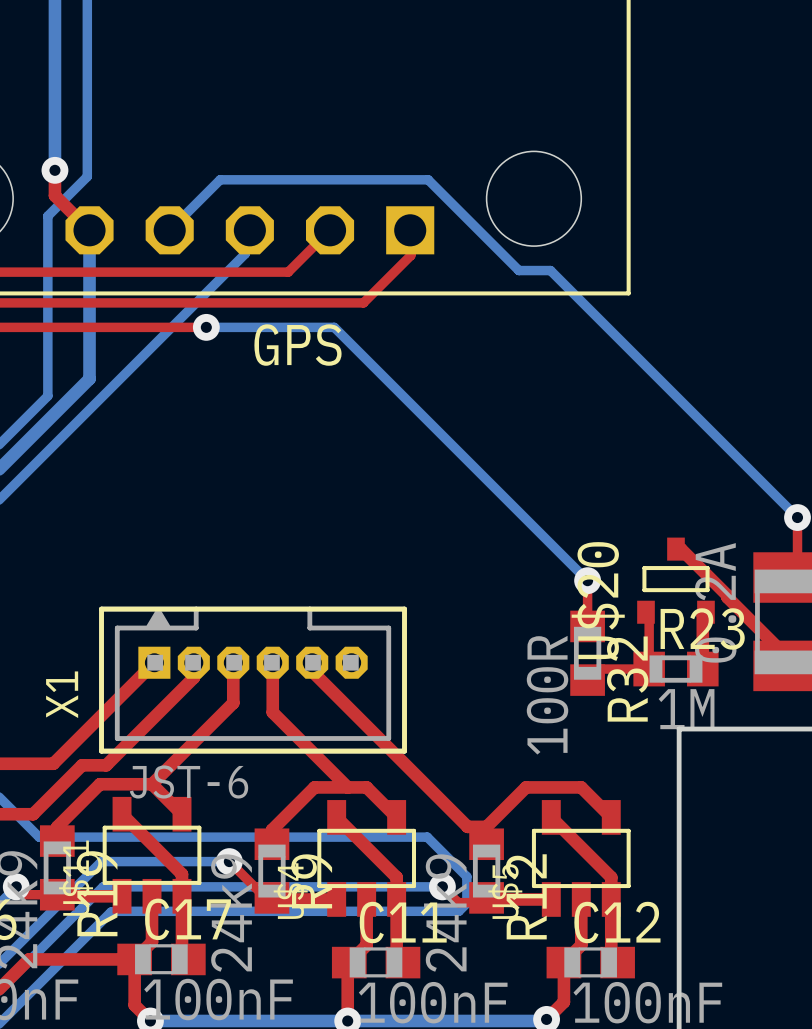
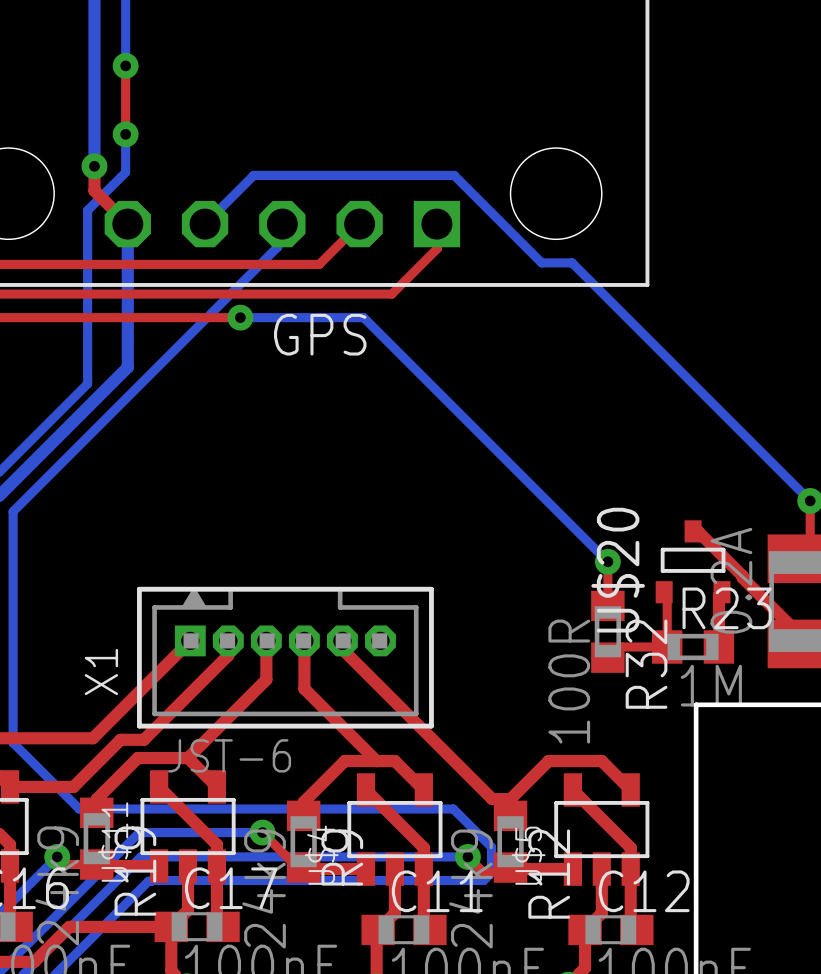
top track: none -> (125, 65) (125, 134)
bottom track: (87, 66) (87, 137) -> none
via: none -> (125, 65)
via: none -> (125, 134)

